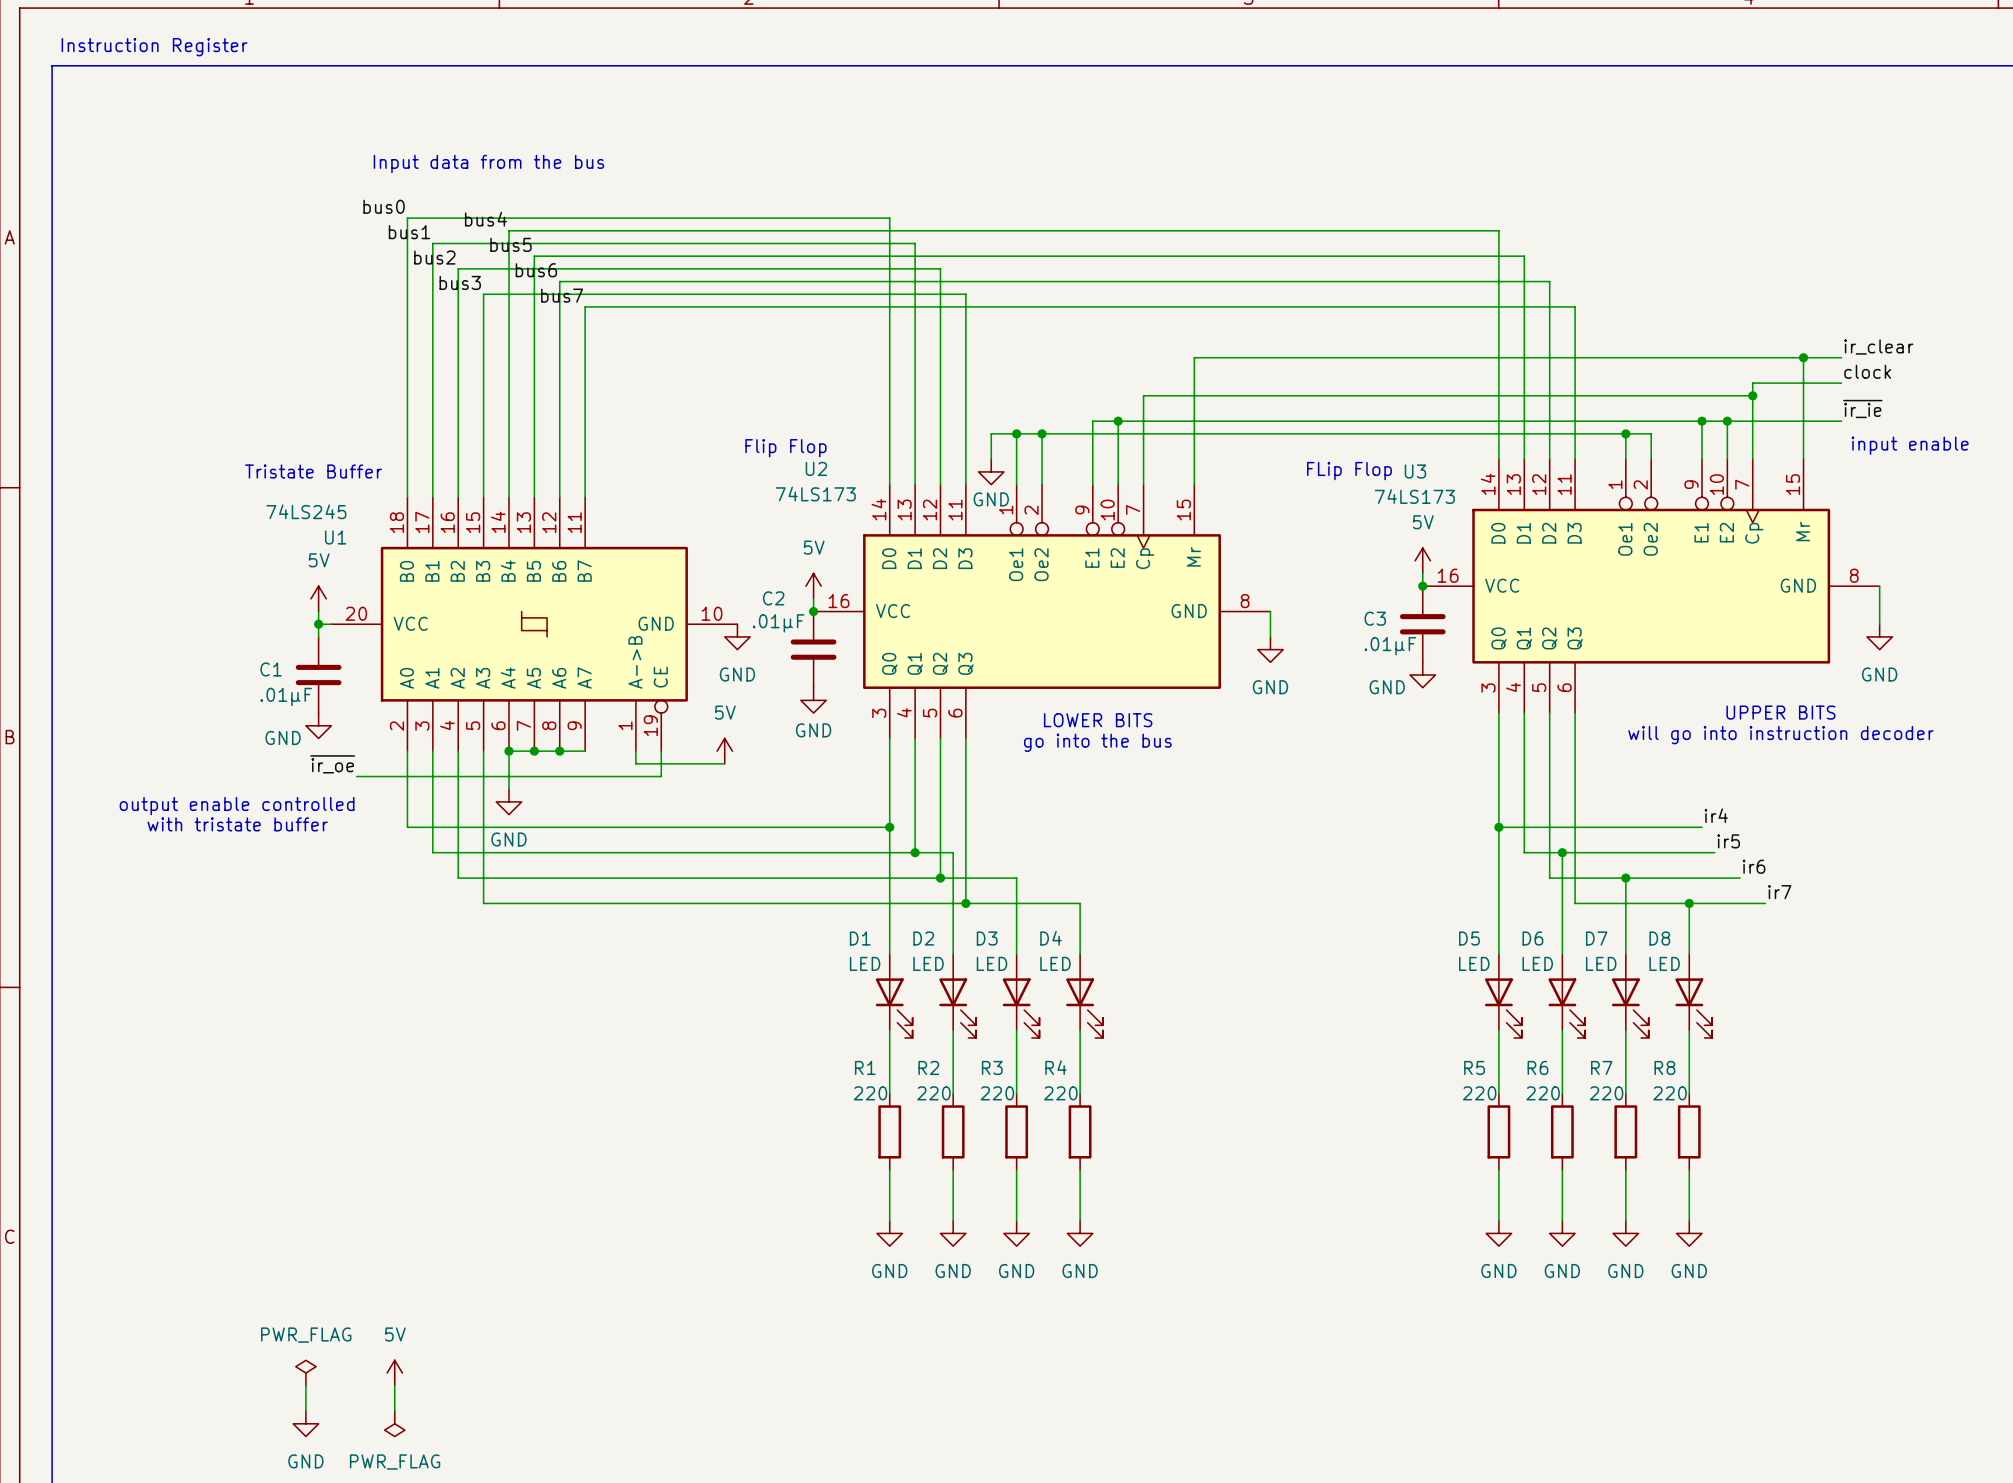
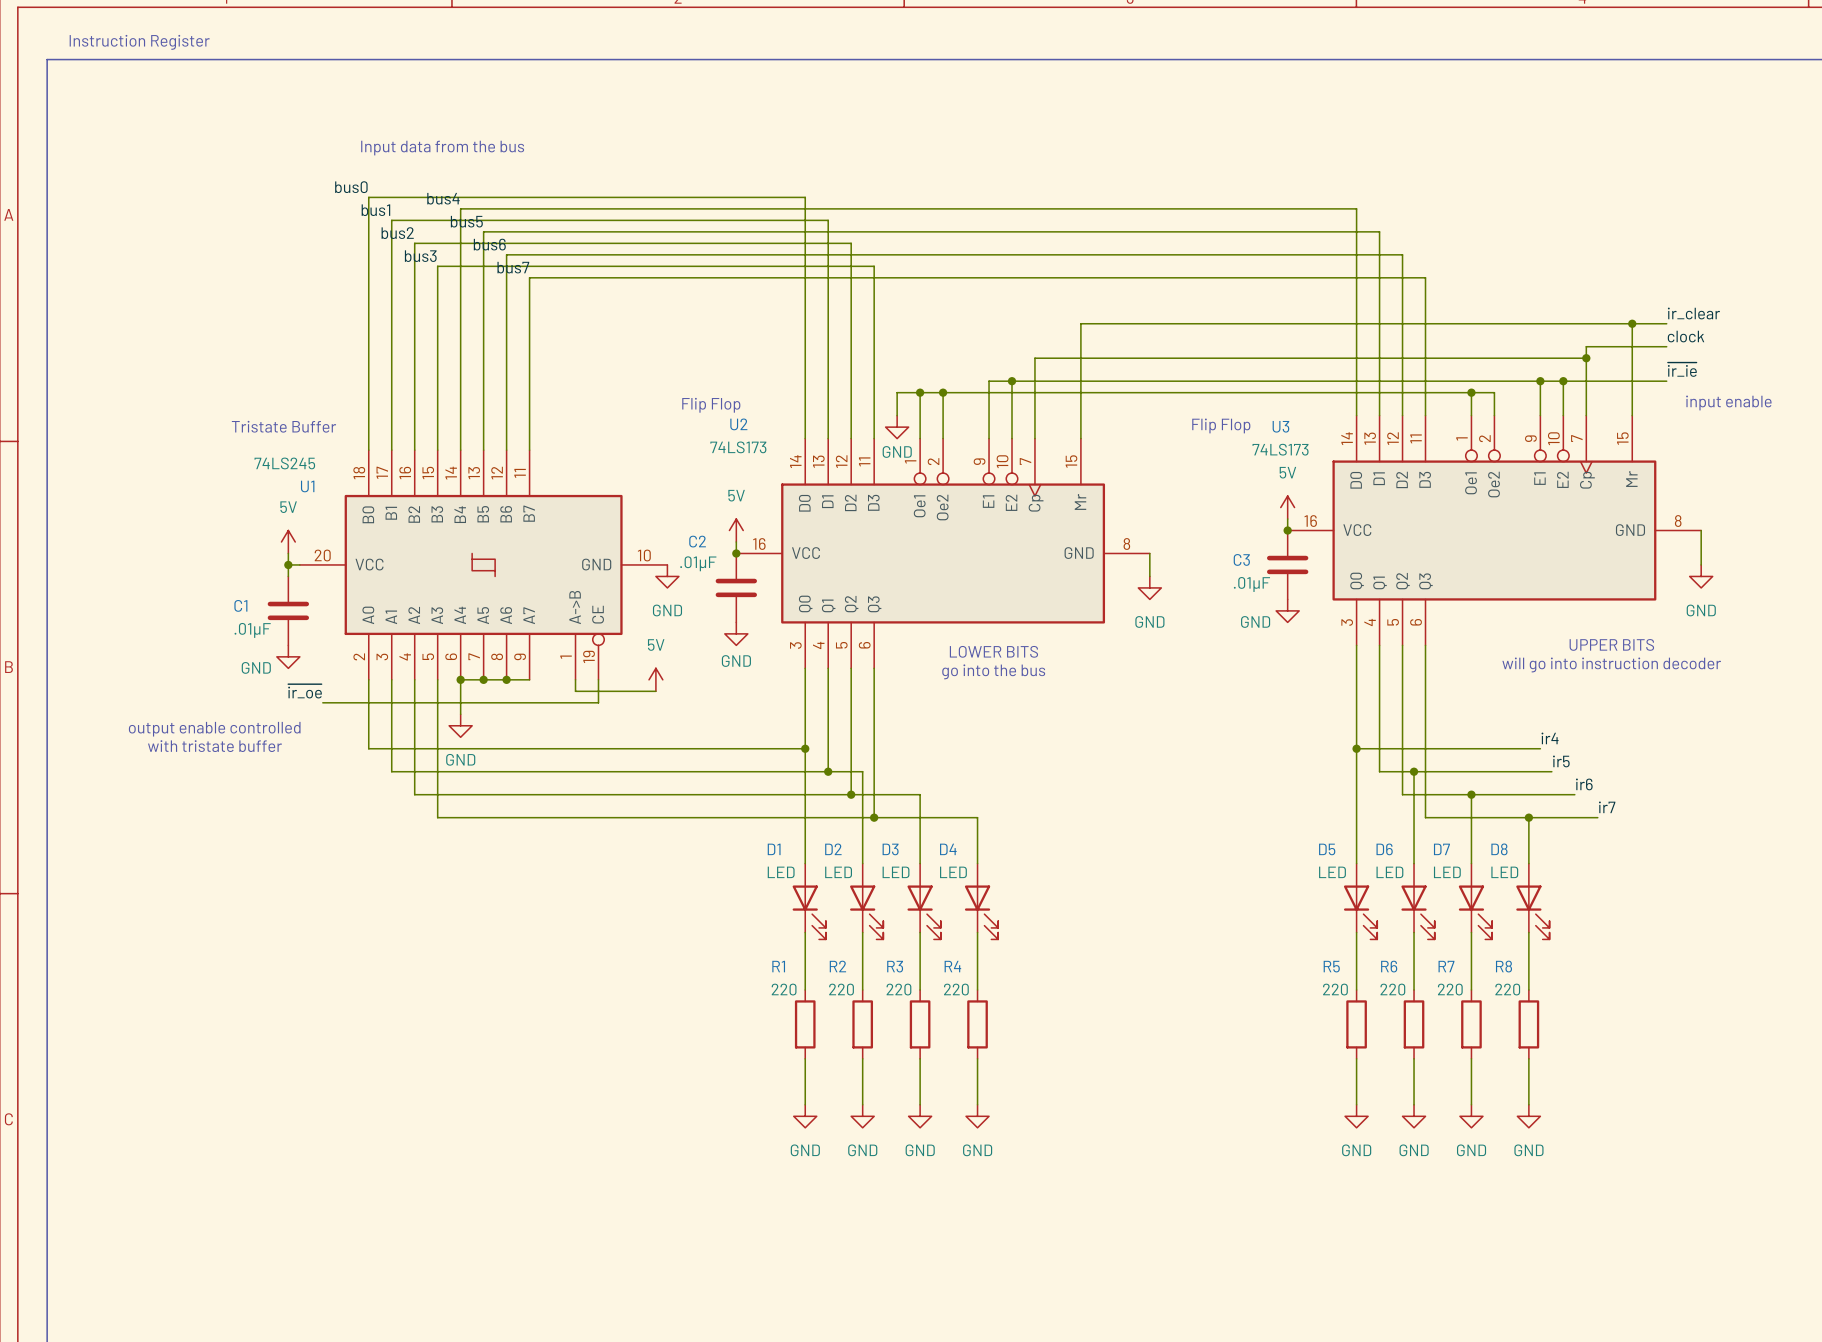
text: FLip Flop (1349, 471) -> Flip Flop (1221, 425)
power symbol: PWR_FLAG (305, 1373) -> none
power symbol: 5V (394, 1373) -> none
wire: (305, 1385) (305, 1411) -> none
wire: (394, 1385) (394, 1411) -> none
power symbol: GND (305, 1423) -> none
power symbol: PWR_FLAG (394, 1423) -> none

